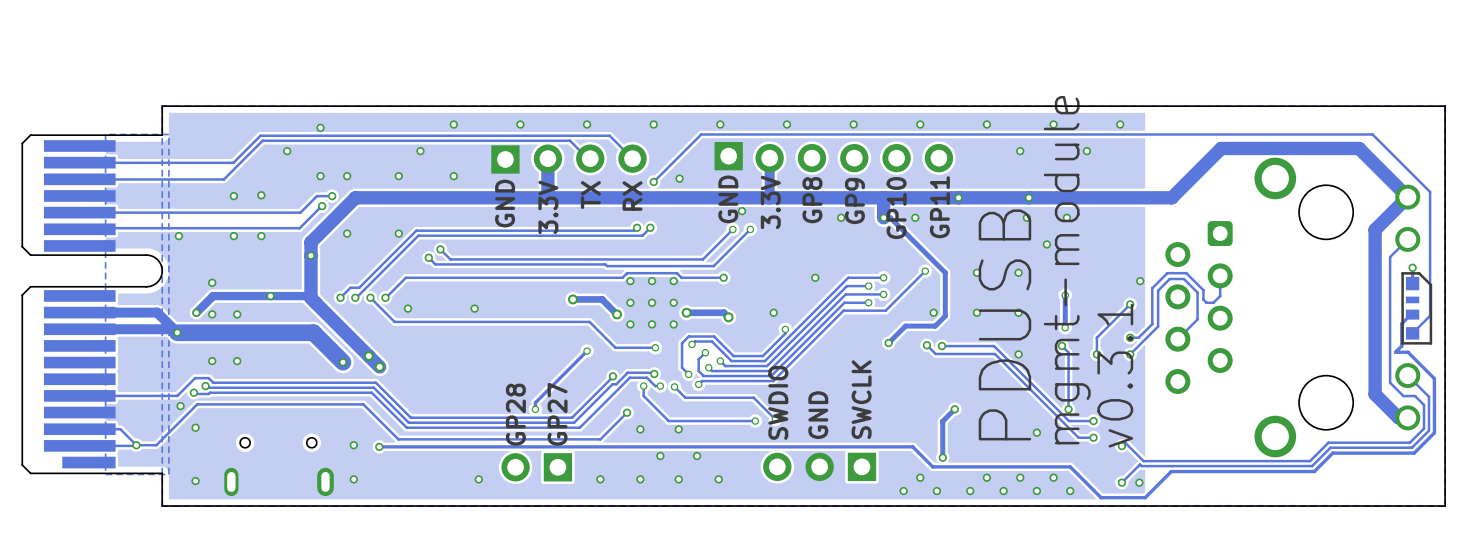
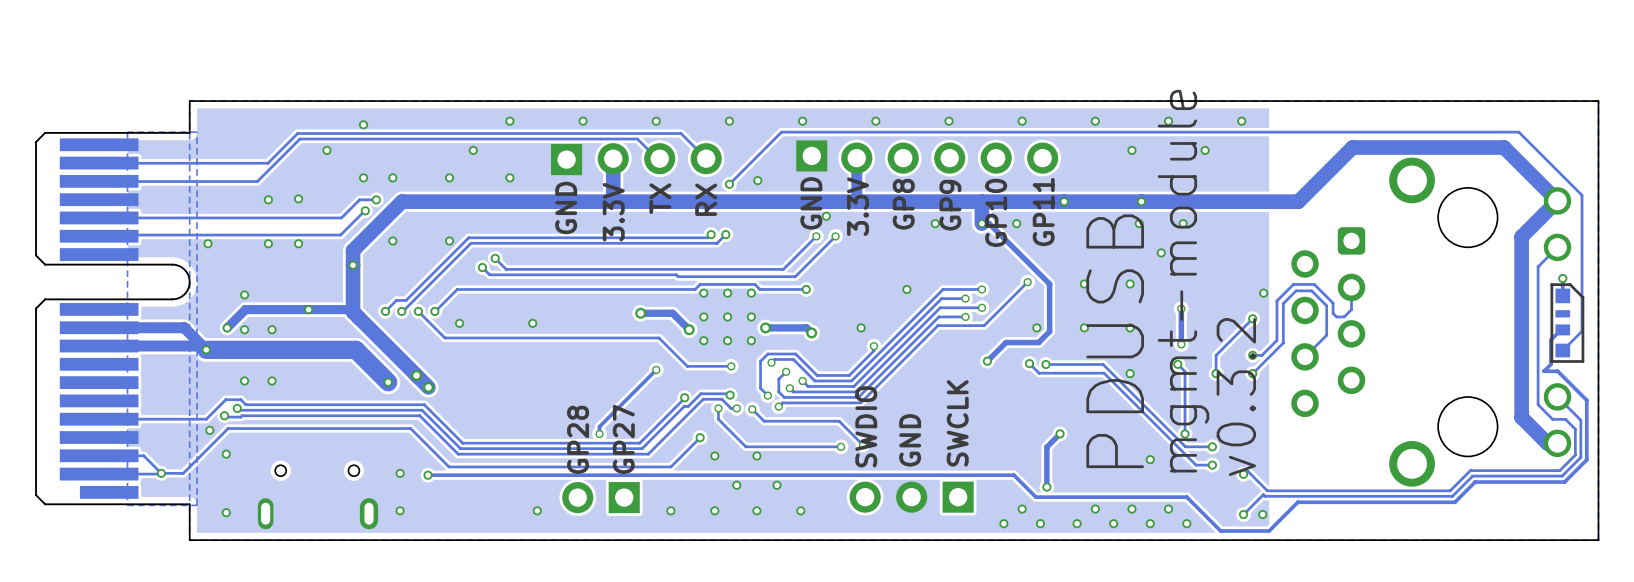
text: v0.3.1 (1115, 375) -> v0.3.2 (1236, 397)

